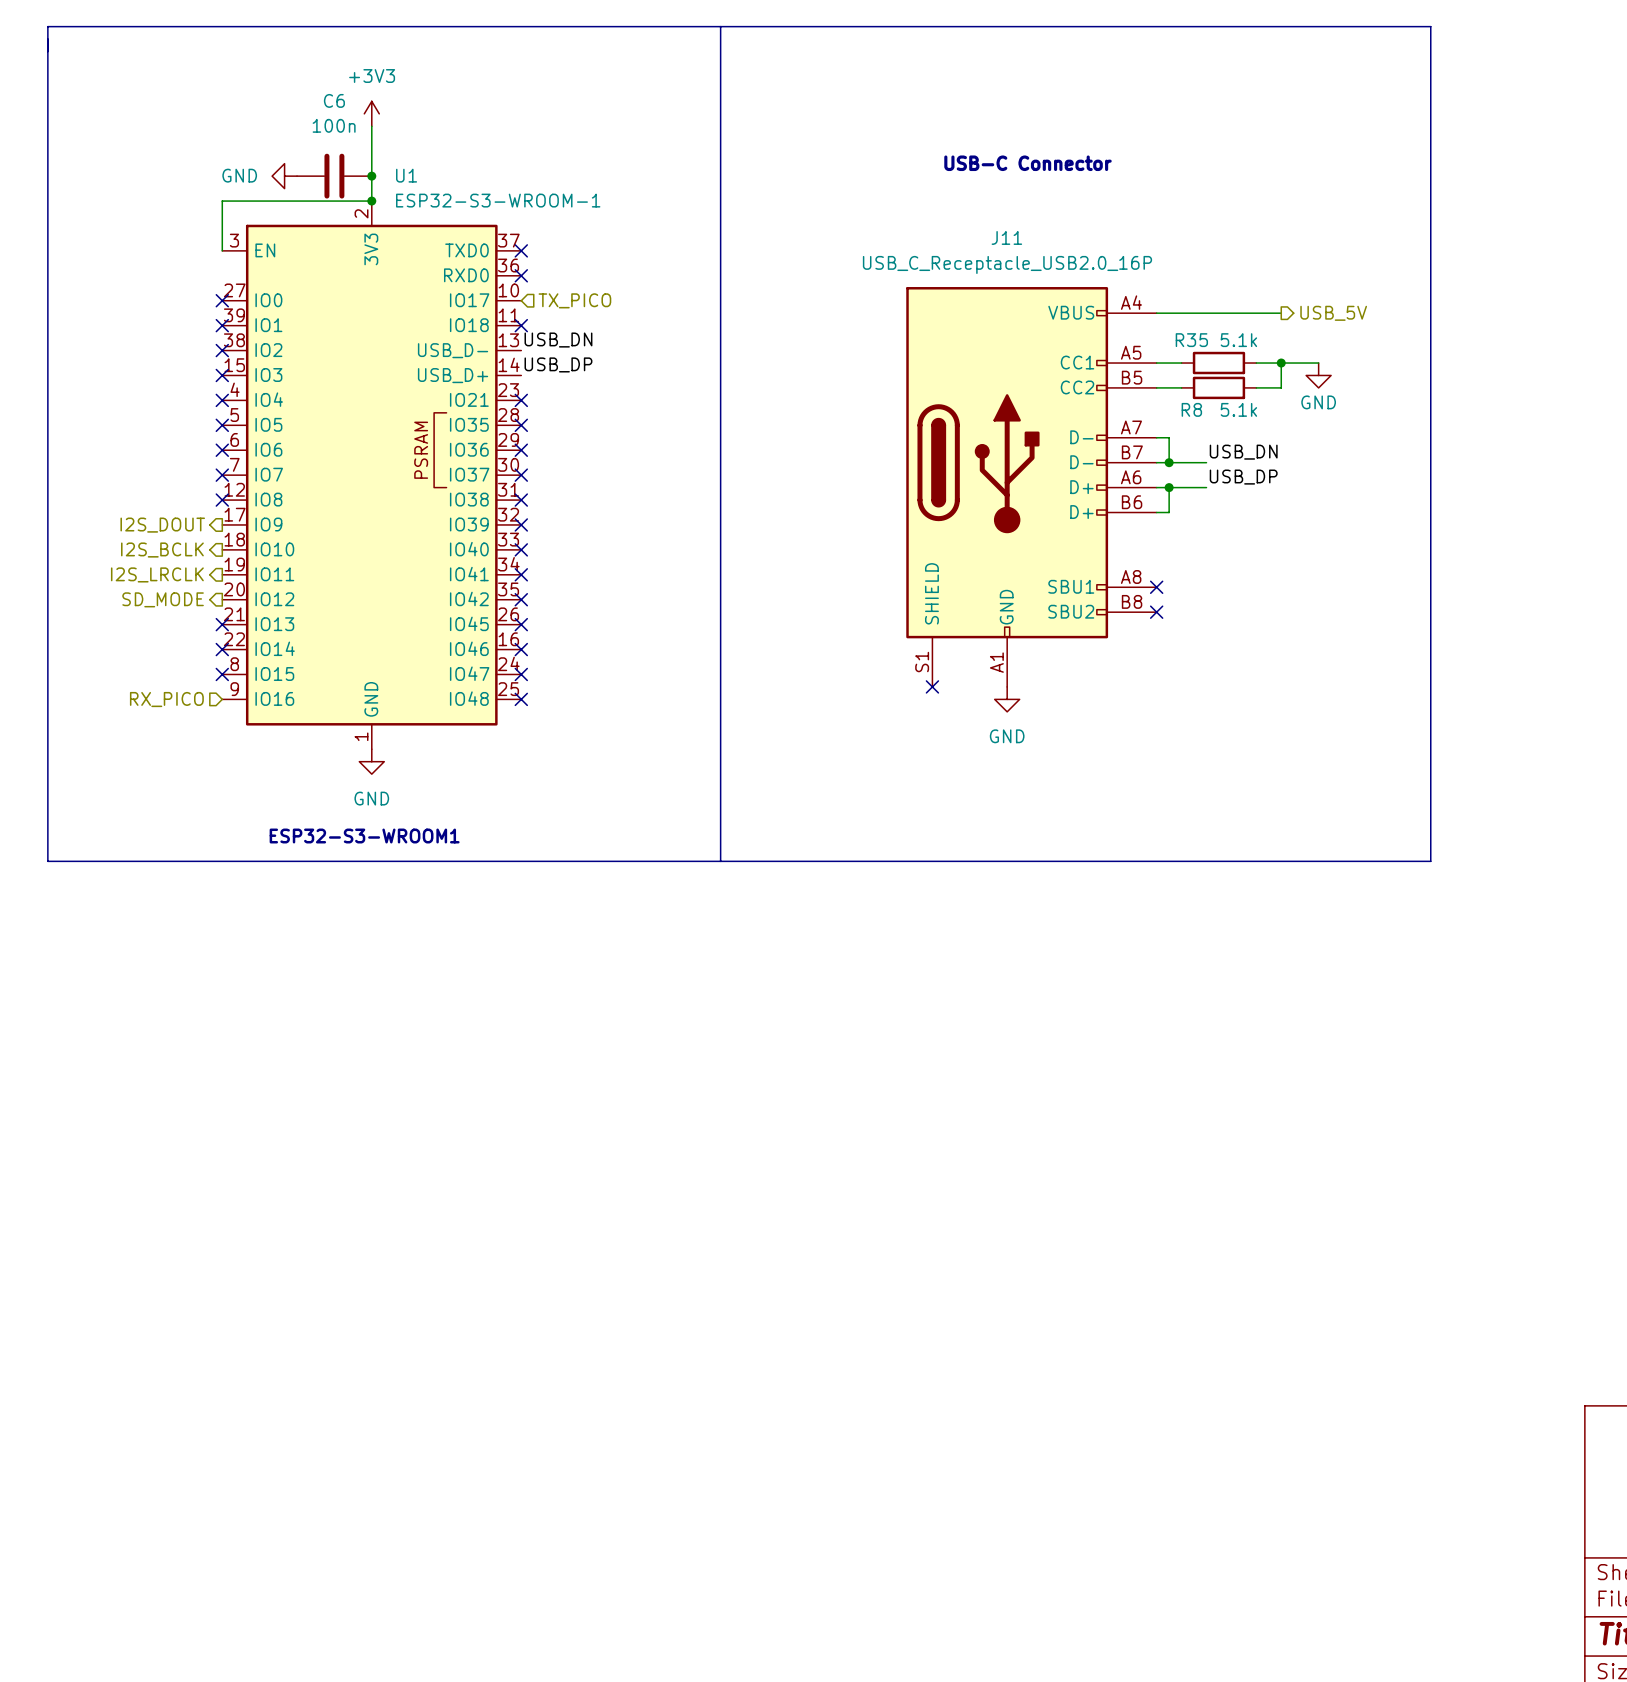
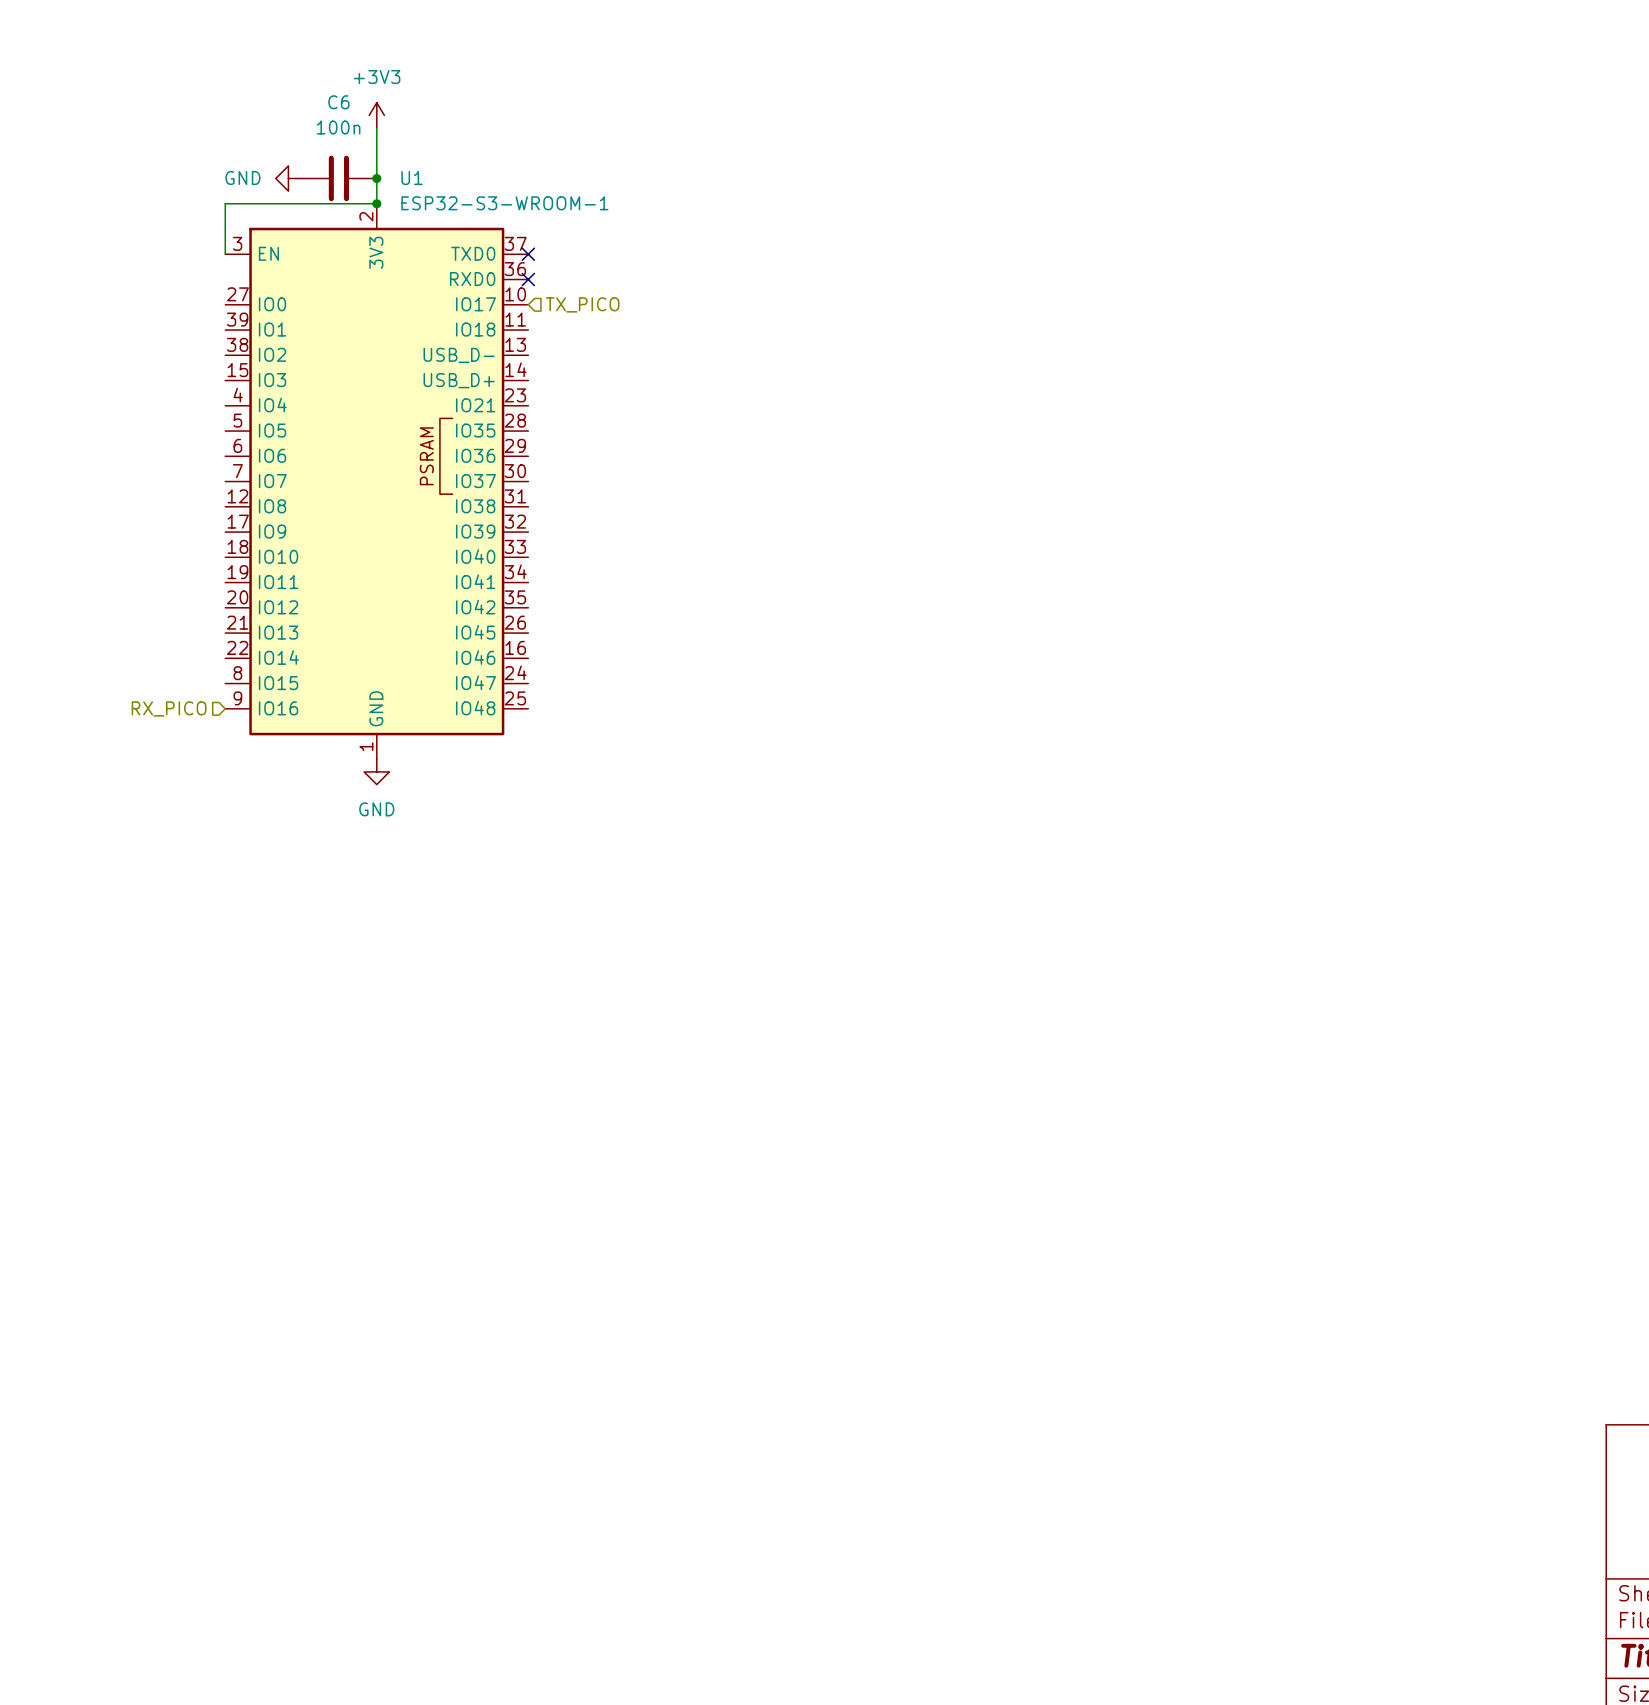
line: (47, 26) (47, 861) (1430, 861) (1430, 26) (47, 26) -> none
line: (720, 26) (720, 861) -> none
text: USB-C Connector (1027, 163) -> none
no-connect mark: (222, 300) -> none
wire: (1156, 313) (1281, 313) -> none
hierarchical label: USB_5V (1333, 313) -> none
no-connect mark: (222, 325) -> none
no-connect mark: (521, 325) -> none
label: USB_DN (558, 340) -> none
no-connect mark: (222, 350) -> none
wire: (1156, 363) (1181, 363) -> none
R35: 5.1k (1218, 363) -> none
wire: (1256, 363) (1318, 363) -> none
wire: (1281, 363) (1281, 387) (1256, 387) -> none
junction: (1281, 363) -> none
label: USB_DP (558, 364) -> none
no-connect mark: (222, 375) -> none
power symbol: GND (1318, 375) -> none
wire: (1156, 387) (1181, 387) -> none
R8: 5.1k (1218, 387) -> none
no-connect mark: (222, 400) -> none
no-connect mark: (521, 400) -> none
no-connect mark: (222, 425) -> none
no-connect mark: (521, 425) -> none
wire: (1156, 437) (1169, 437) (1169, 462) -> none
no-connect mark: (222, 450) -> none
no-connect mark: (521, 450) -> none
label: USB_DN (1243, 452) -> none
wire: (1156, 462) (1206, 462) -> none
junction: (1169, 462) -> none
no-connect mark: (222, 475) -> none
no-connect mark: (521, 475) -> none
label: USB_DP (1243, 477) -> none
J11: USB_C_Receptacle_USB2.0_16P (1031, 486) -> none
wire: (1156, 487) (1206, 487) -> none
wire: (1169, 487) (1169, 512) (1156, 512) -> none
junction: (1169, 487) -> none
no-connect mark: (222, 500) -> none
no-connect mark: (521, 500) -> none
no-connect mark: (521, 524) -> none
hierarchical label: I2S_DOUT (162, 525) -> none
no-connect mark: (521, 549) -> none
hierarchical label: I2S_BCLK (162, 550) -> none
hierarchical label: I2S_LRCLK (157, 574) -> none
no-connect mark: (521, 574) -> none
no-connect mark: (1156, 587) -> none
hierarchical label: SD_MODE (163, 599) -> none
no-connect mark: (521, 599) -> none
no-connect mark: (1156, 612) -> none
no-connect mark: (222, 624) -> none
no-connect mark: (521, 624) -> none
no-connect mark: (222, 649) -> none
no-connect mark: (521, 649) -> none
no-connect mark: (222, 674) -> none
no-connect mark: (521, 674) -> none
no-connect mark: (932, 686) -> none
no-connect mark: (521, 699) -> none
power symbol: GND (1007, 699) -> none
text: ESP32-S3-WROOM1 (364, 836) -> none

